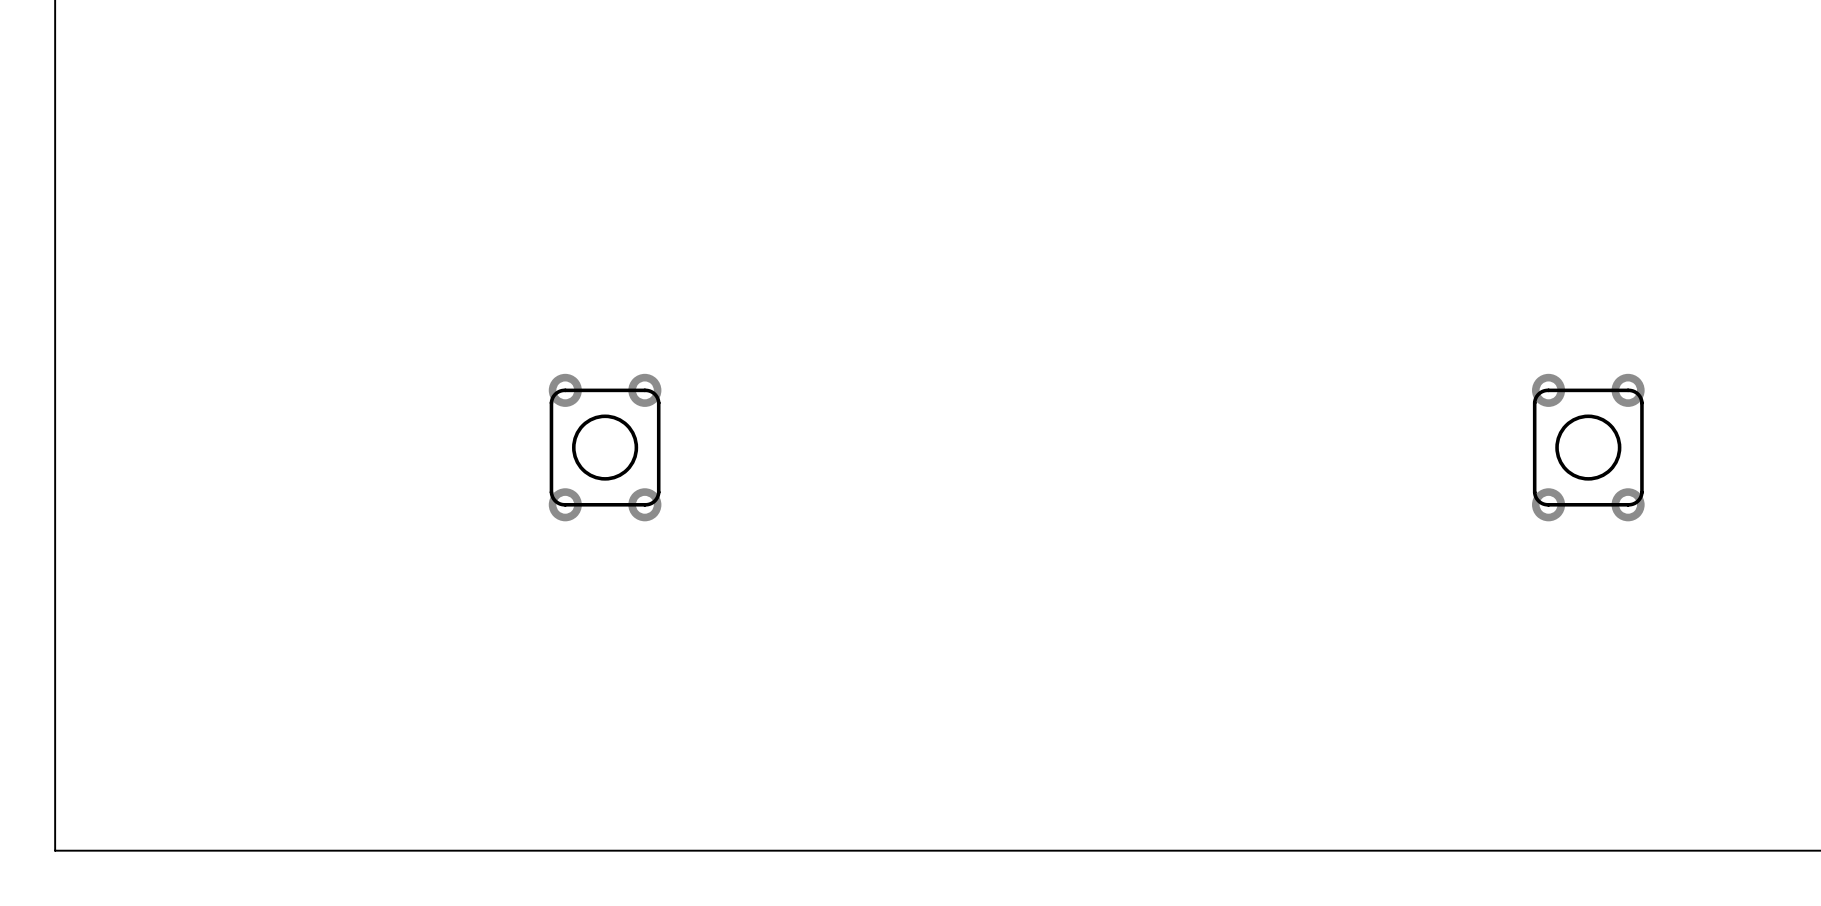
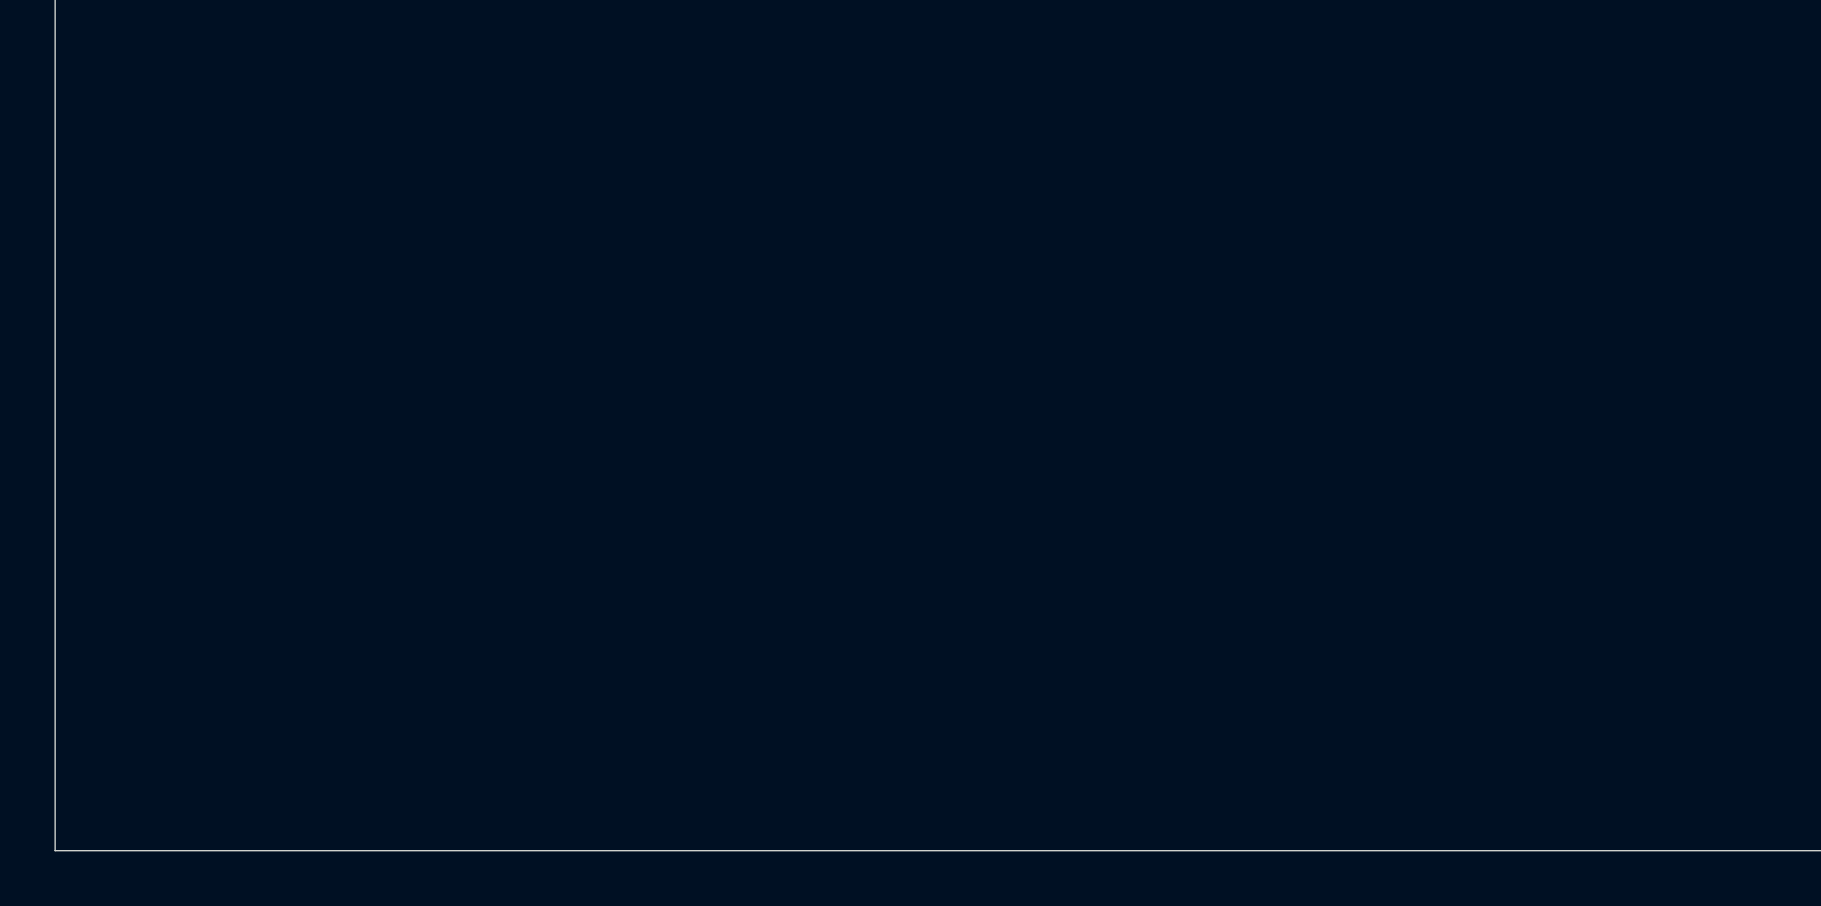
part: (605, 447) -> none
part: (1588, 447) -> none

